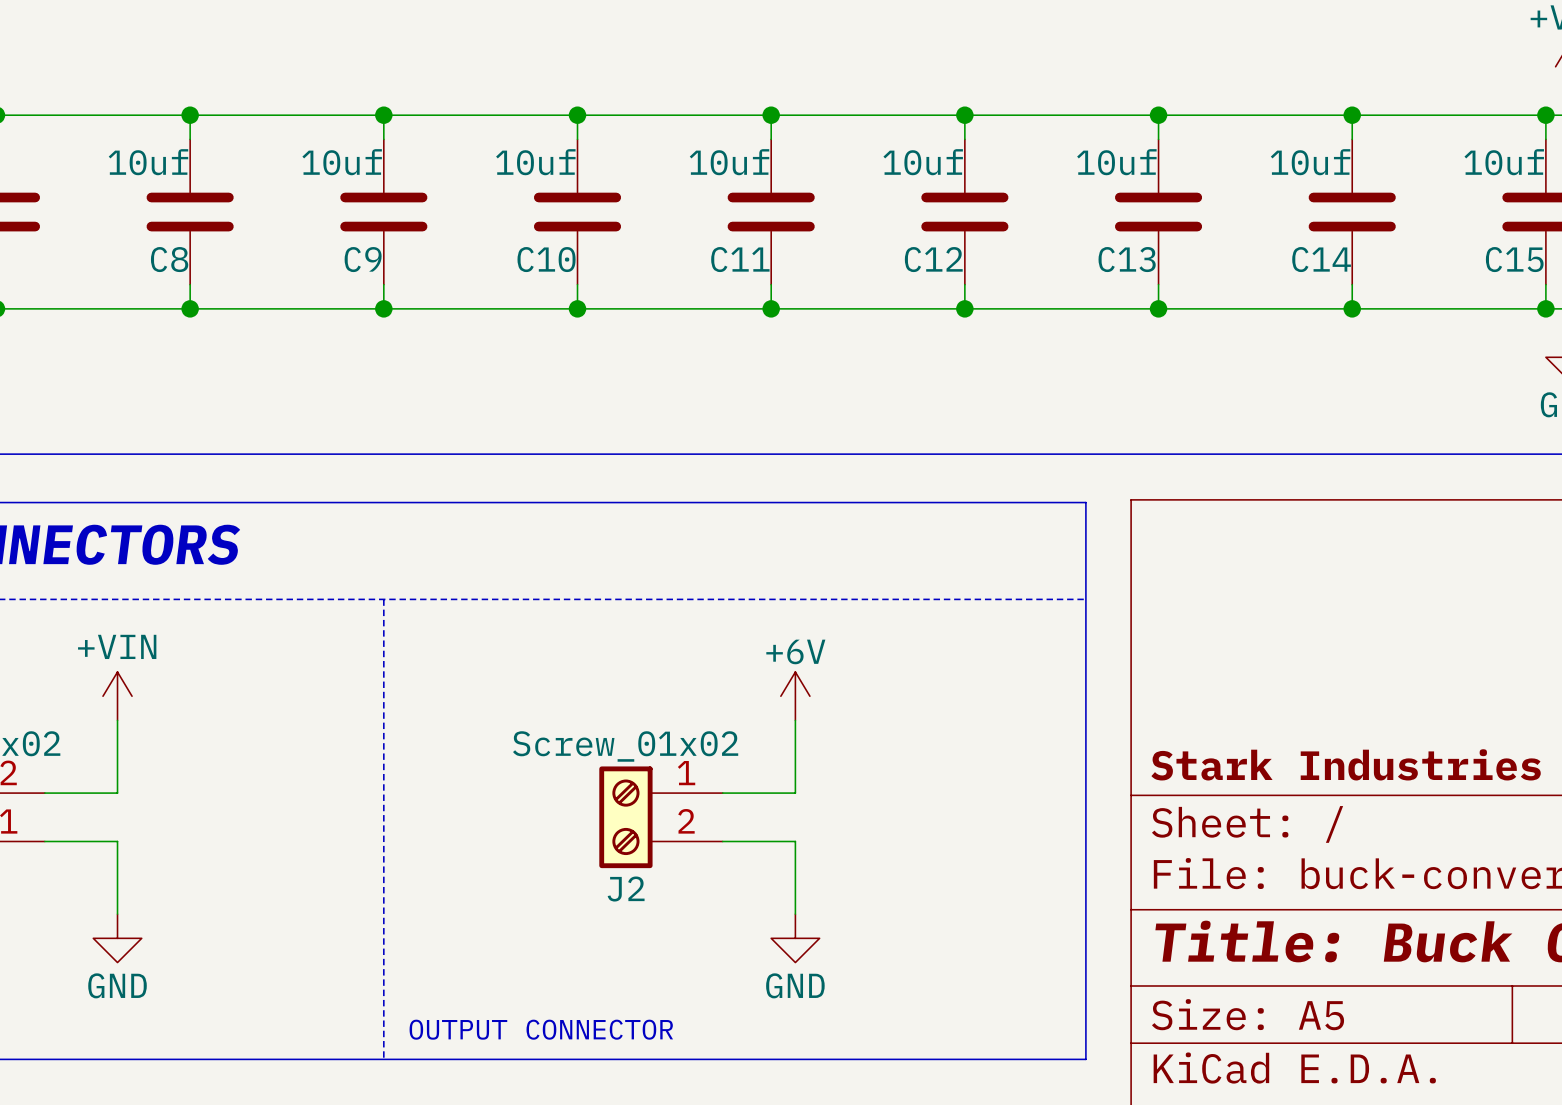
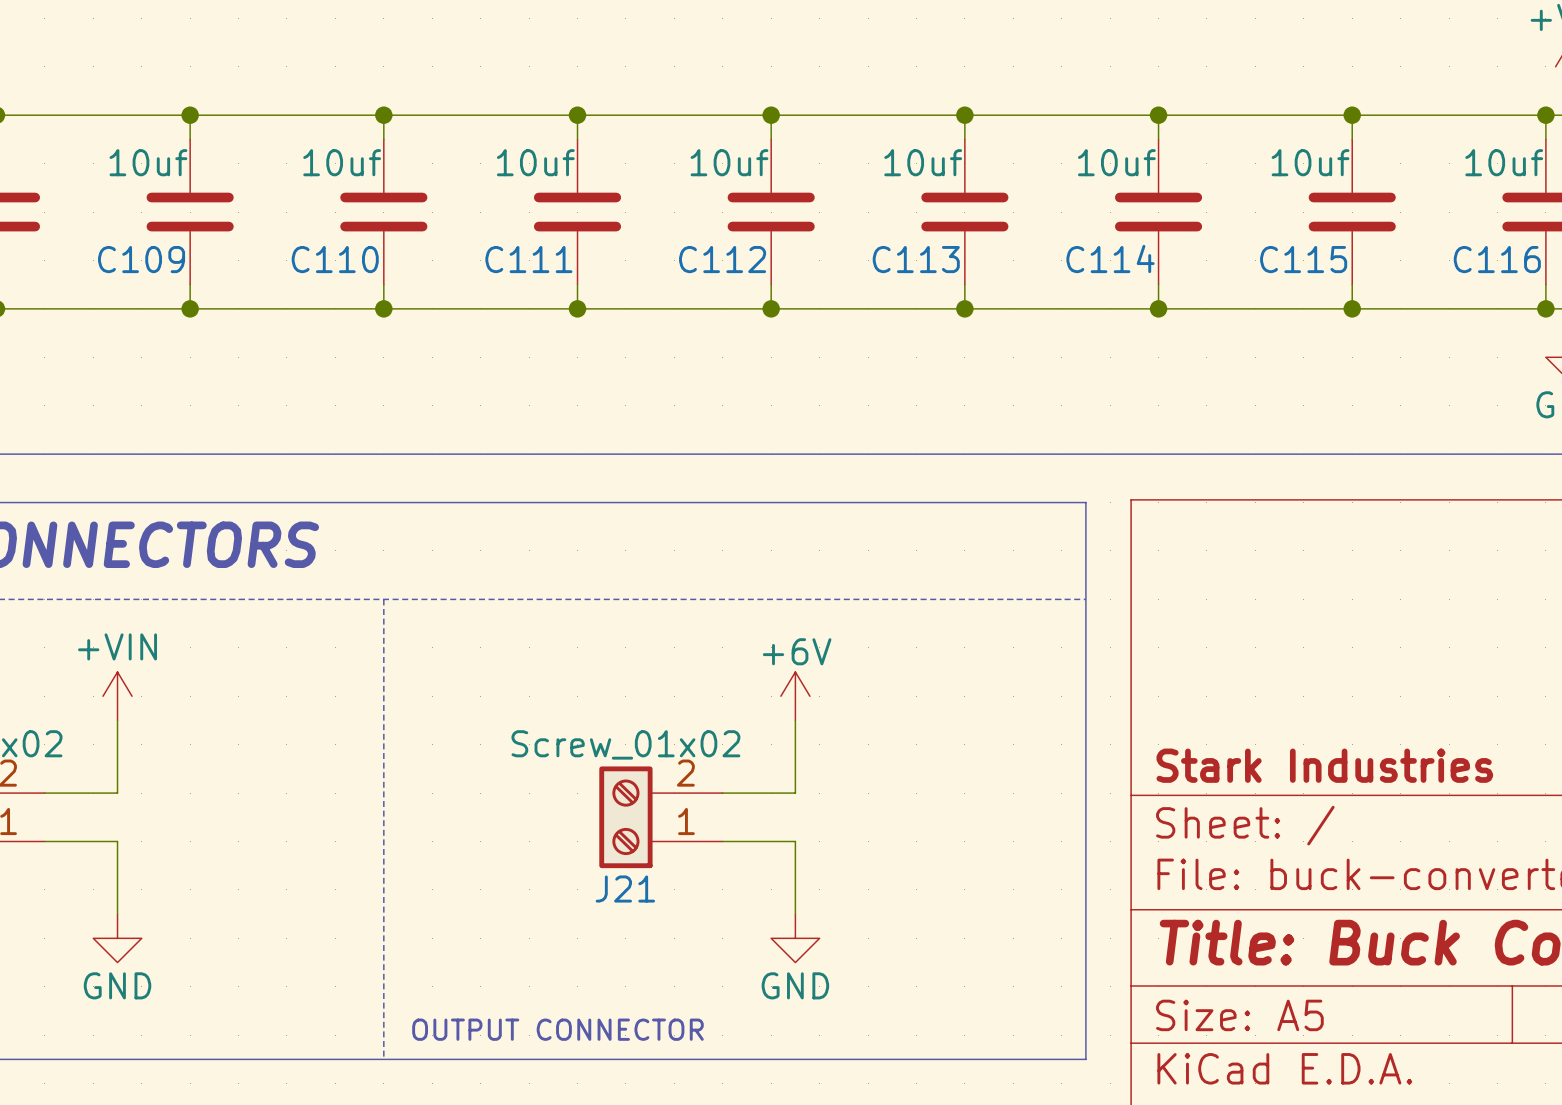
C8 name: C8 (169, 259) -> C109 (141, 259)
C9 name: C9 (363, 259) -> C110 (335, 259)
C10 name: C10 (546, 259) -> C111 (528, 259)
C11 name: C11 (740, 259) -> C112 (722, 259)
C12 name: C12 (933, 259) -> C113 (916, 259)
C13 name: C13 (1127, 259) -> C114 (1110, 258)
C14 name: C14 (1321, 259) -> C115 (1303, 259)
C15 name: C15 (1514, 259) -> C116 (1497, 259)
J2: Screw_01x02 (661, 817) -> none
J21: none -> Screw_01x02 (661, 817)

